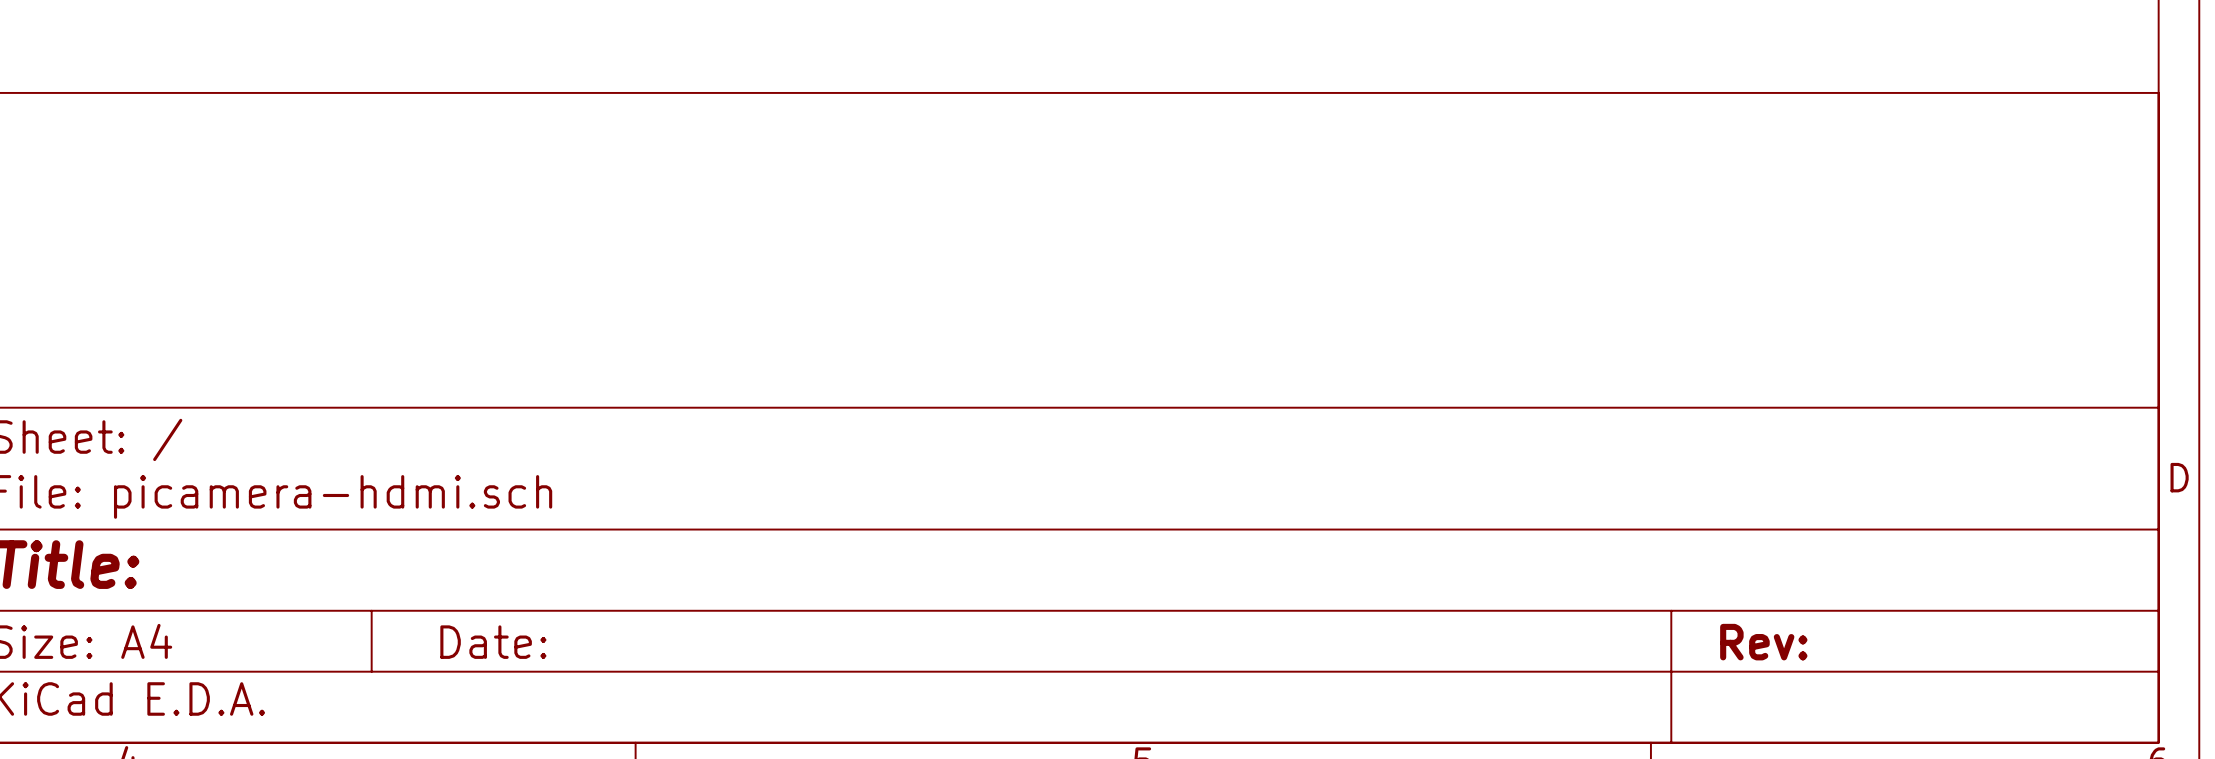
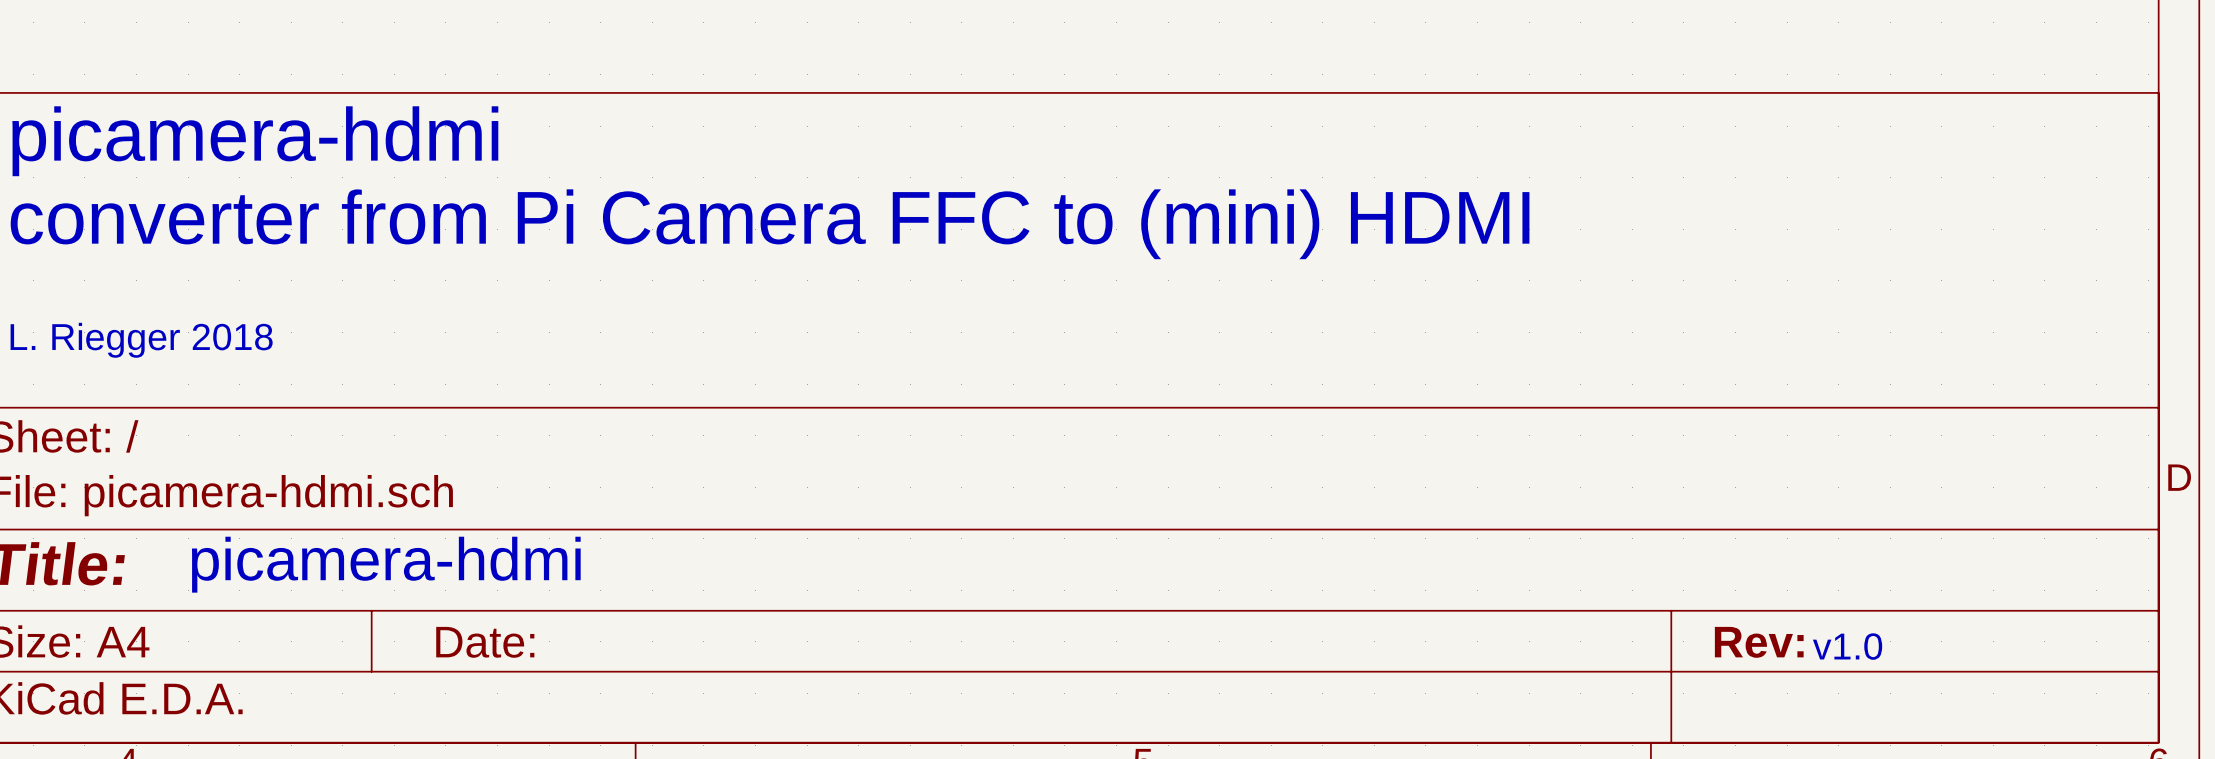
text: none -> picamera-hdmi (255, 141)
text: none -> converter from Pi Camera FFC to (mini) HDMI (770, 224)
text: none -> L. Riegger 2018 (141, 340)
text: none -> picamera-hdmi (386, 564)
text: none -> v1.0 (1847, 646)

